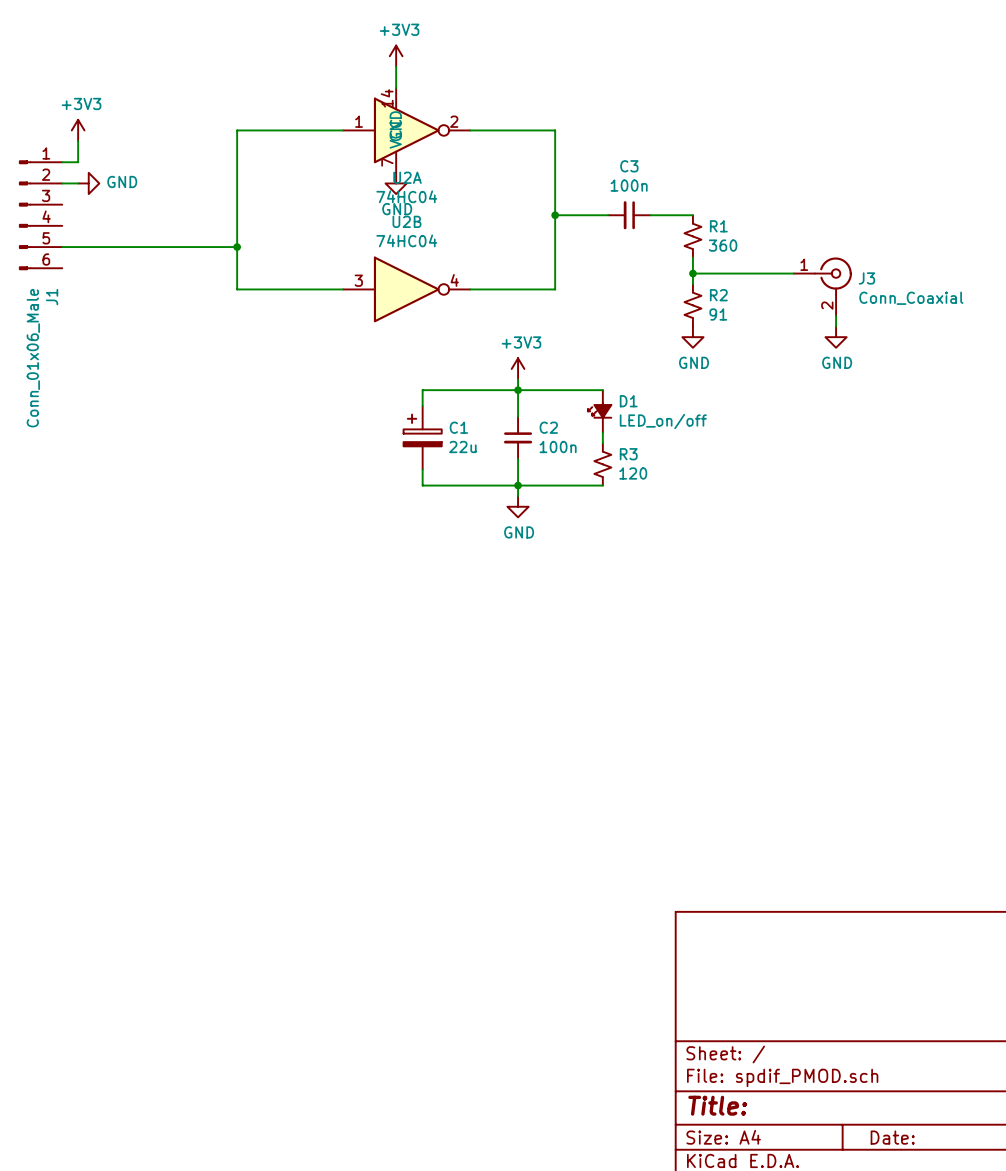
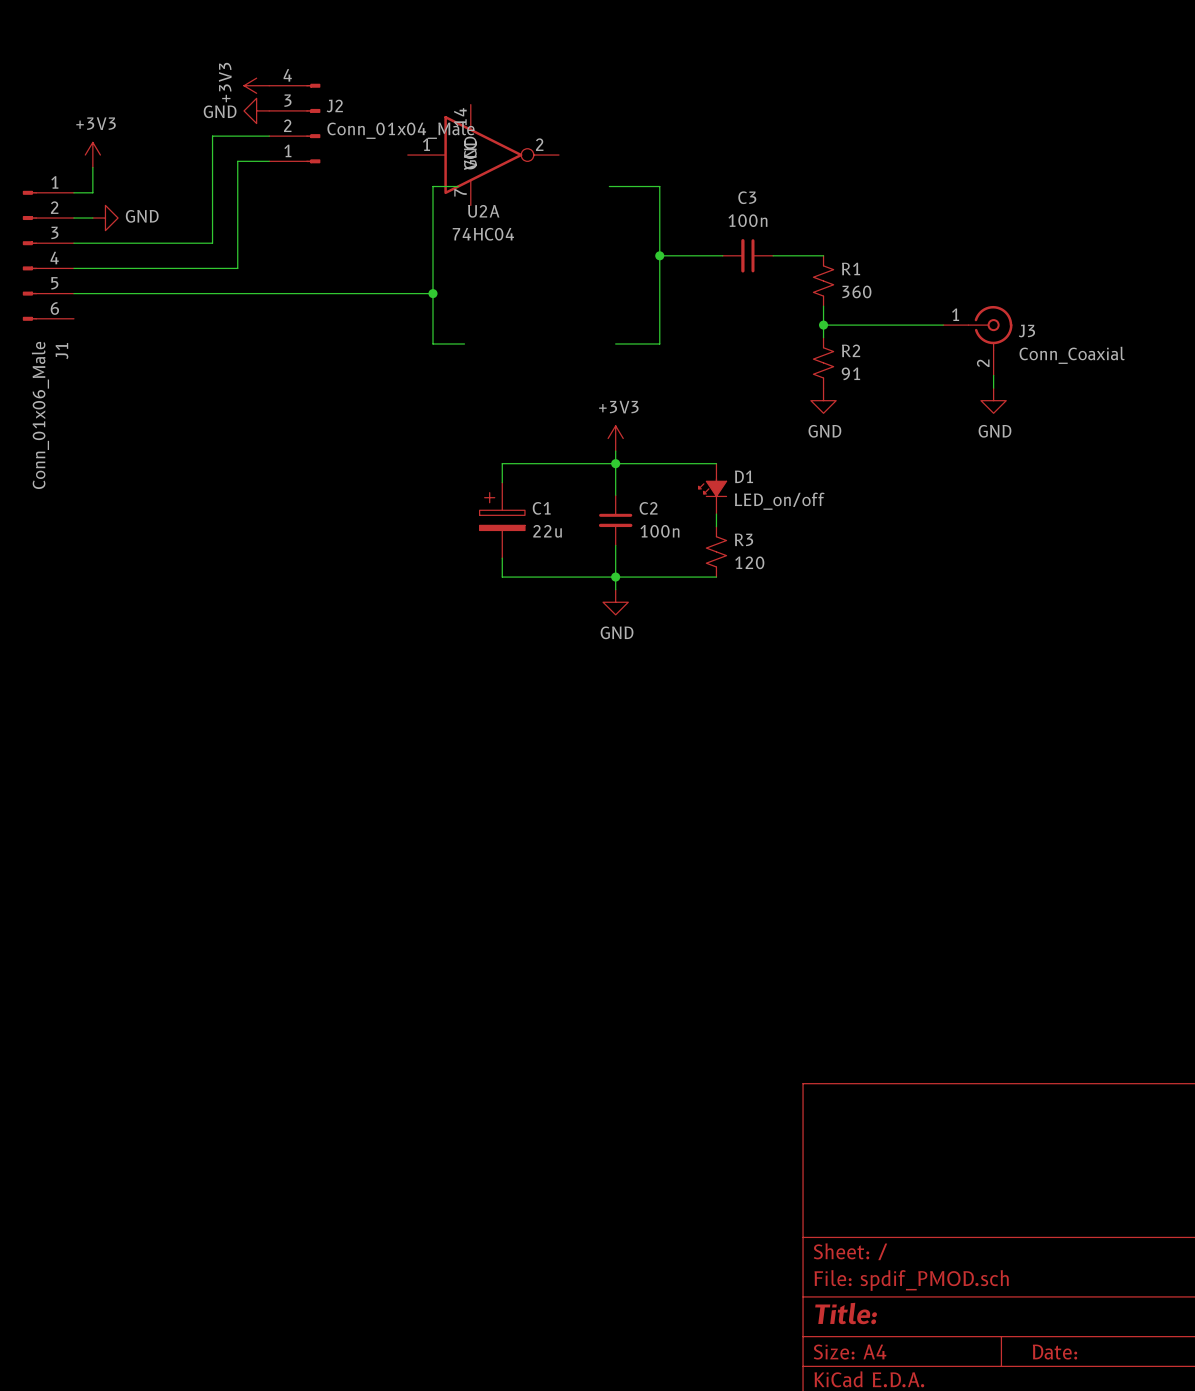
power symbol rotation: 0° (396, 56) -> 90° counterclockwise (256, 85)
power symbol position: +3V3 (396, 56) -> +3V3 (256, 85)
wire: (396, 66) (396, 88) -> none
J2: none -> Conn_01x04_Male (294, 123)
wire: none -> (269, 136) (212, 136) (212, 243) (73, 243)
wire: (343, 130) (237, 130) (237, 289) (343, 289) -> none
wire: (470, 130) (555, 130) (555, 156) -> (609, 186) (659, 186)
wire: none -> (269, 161) (237, 161) (237, 268) (73, 268)
wire: none -> (458, 186) (433, 186) (433, 343) (464, 343)
power symbol rotation: 0° (396, 183) -> 90° clockwise (256, 110)
power symbol position: GND (396, 183) -> GND (256, 110)
wire: none -> (281, 293) (433, 293)
junction: (237, 247) -> none
junction: none -> (433, 293)
U2B: 74HC04 (406, 289) -> none
wire: (470, 289) (518, 289) -> none

